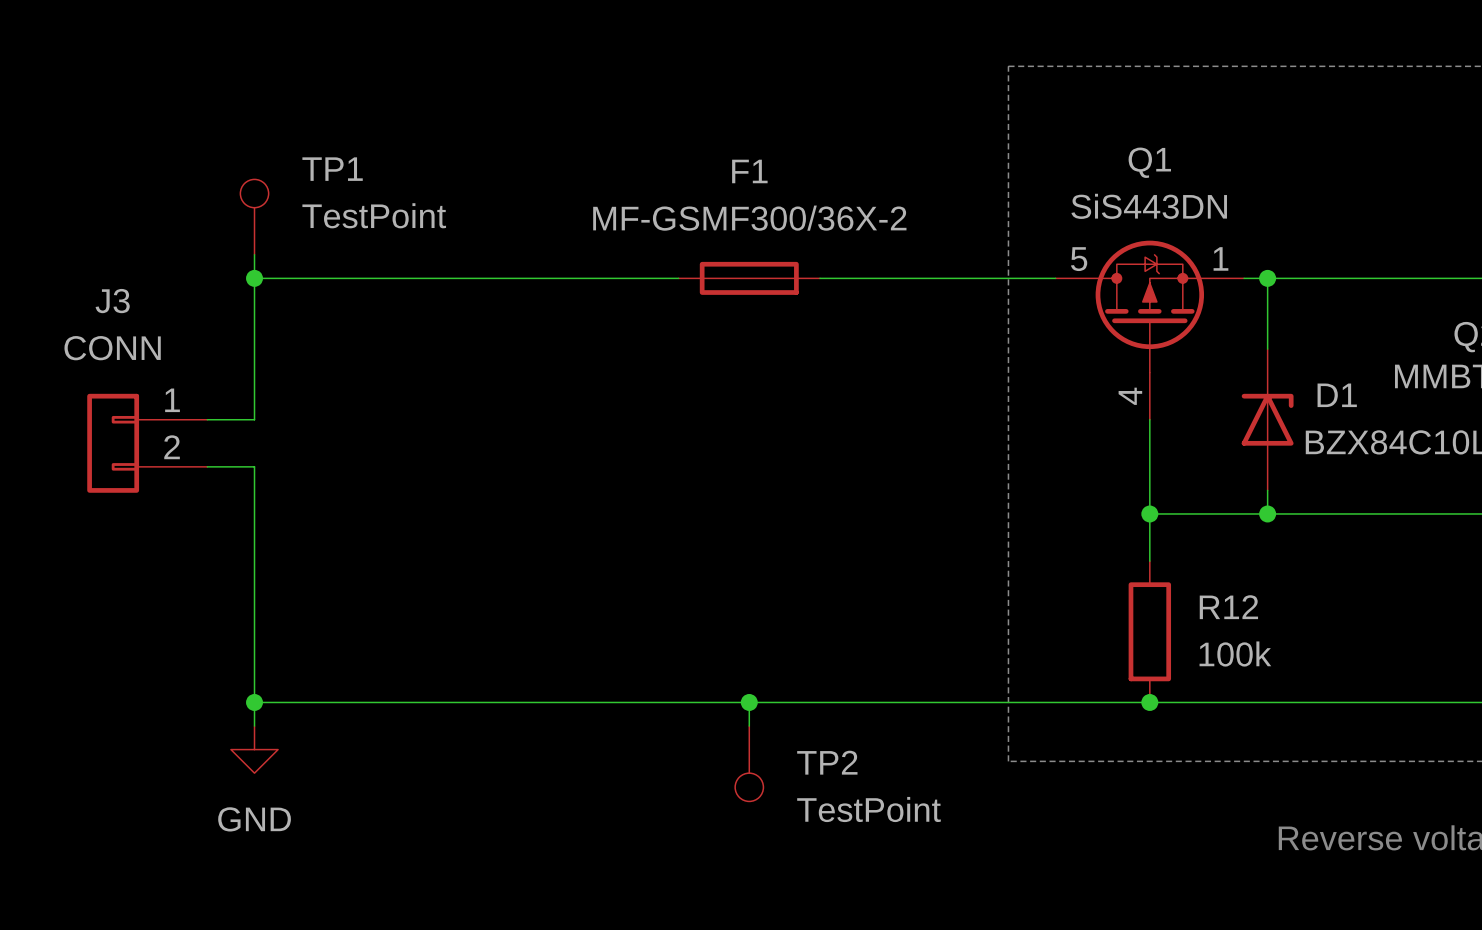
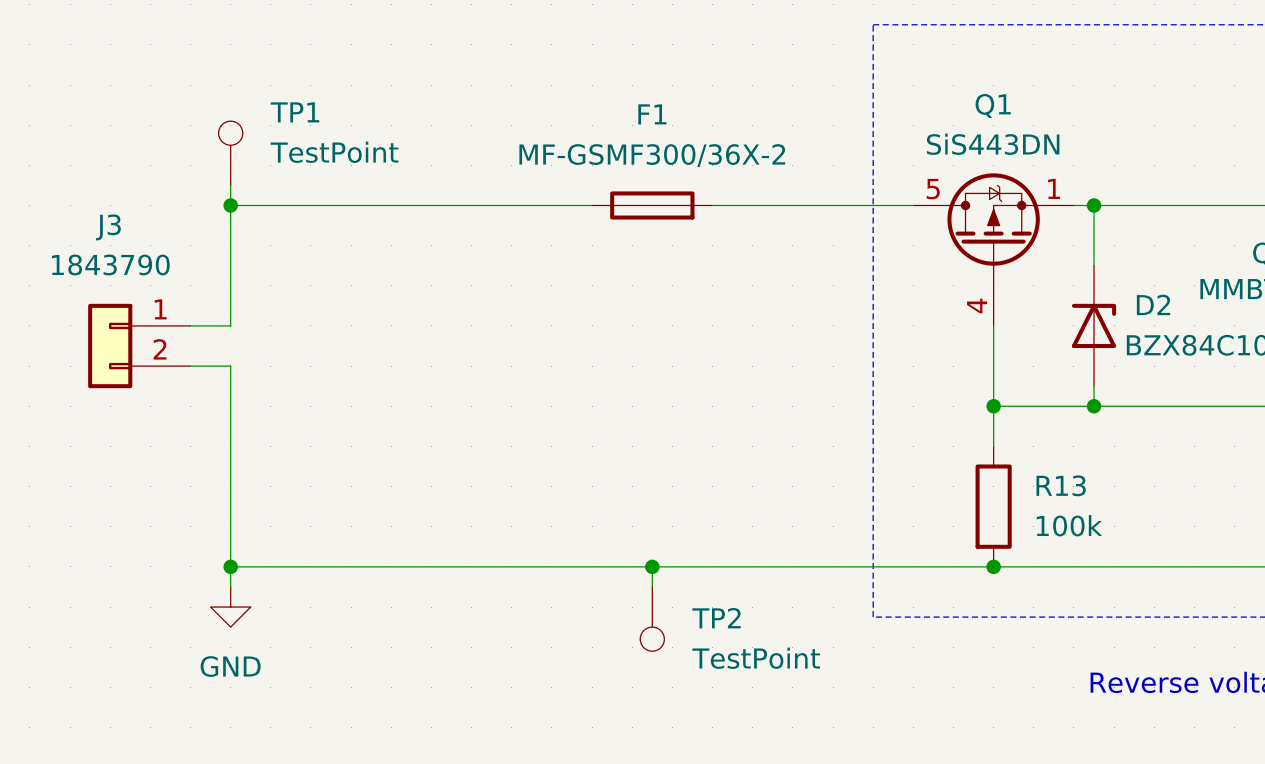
J3 value: CONN (112, 348) -> 1843790 (110, 264)
D1 name: D1 (1337, 395) -> D2 (1153, 304)
R12 name: R12 (1228, 607) -> R13 (1061, 485)

